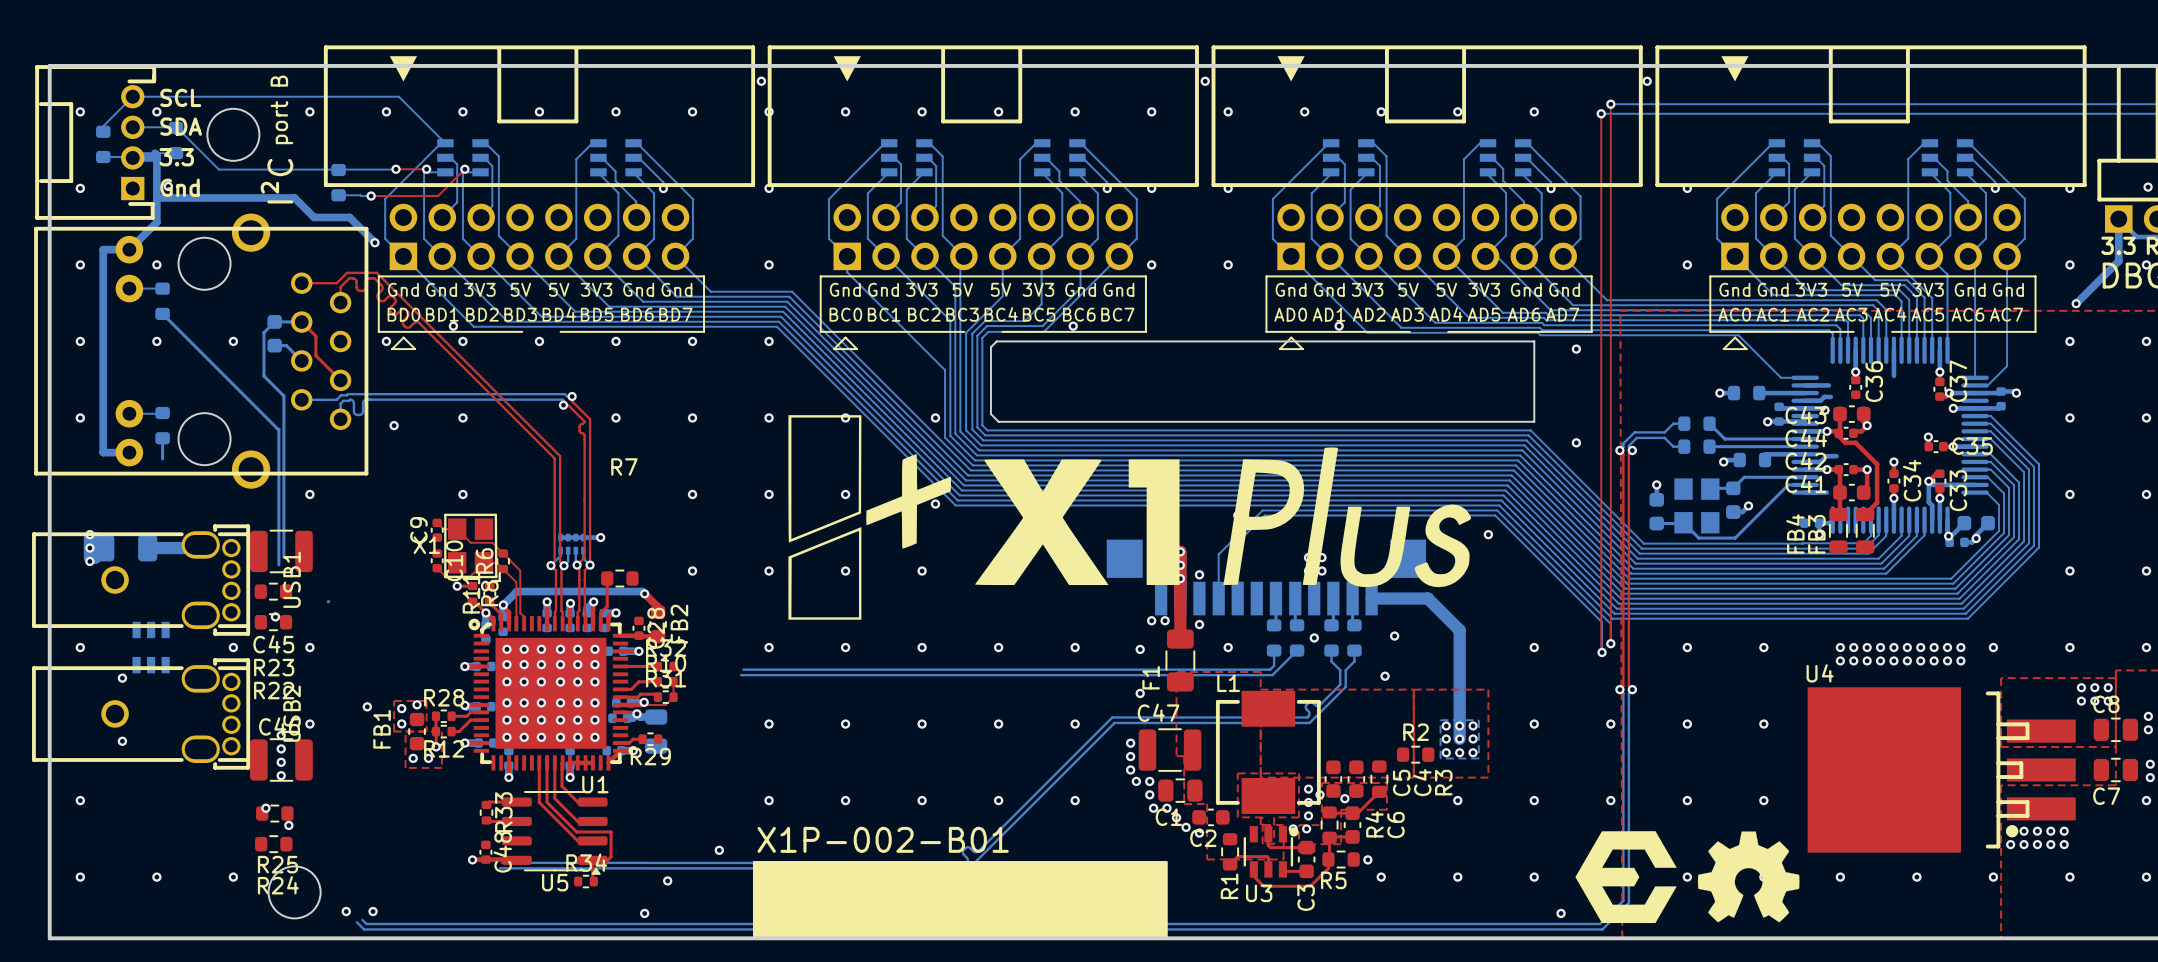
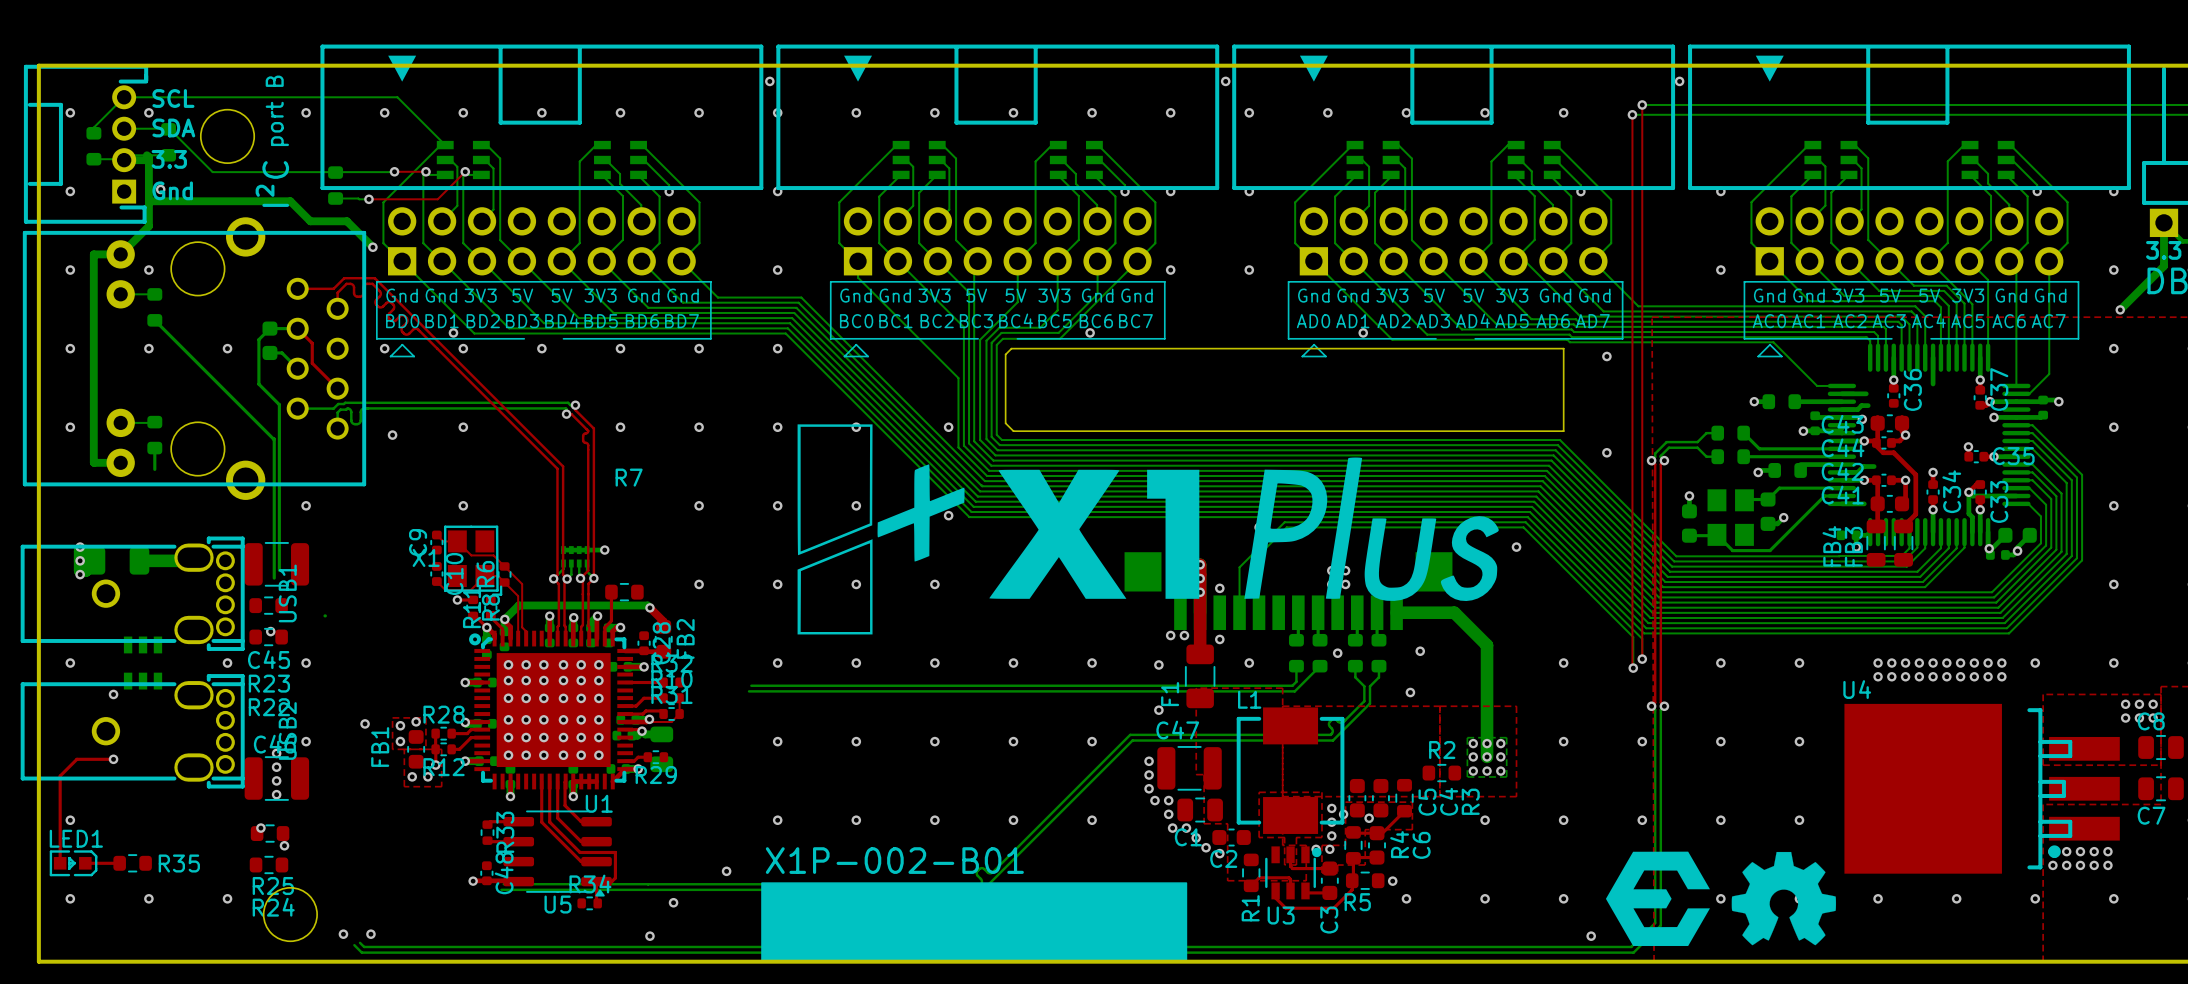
top track: none -> (113, 759) (76, 759) (60, 776) (60, 863)
LED1: none -> (73, 863)
top track: none -> (85, 863) (119, 863)
R35: none -> (132, 863)

